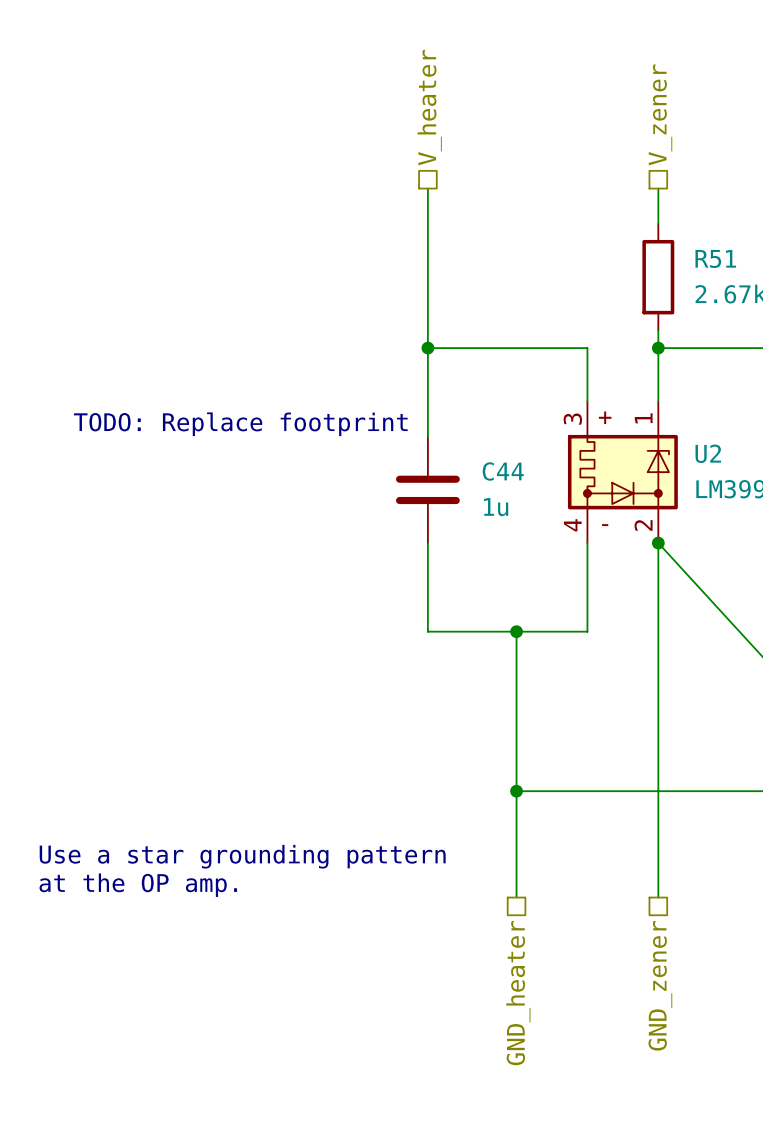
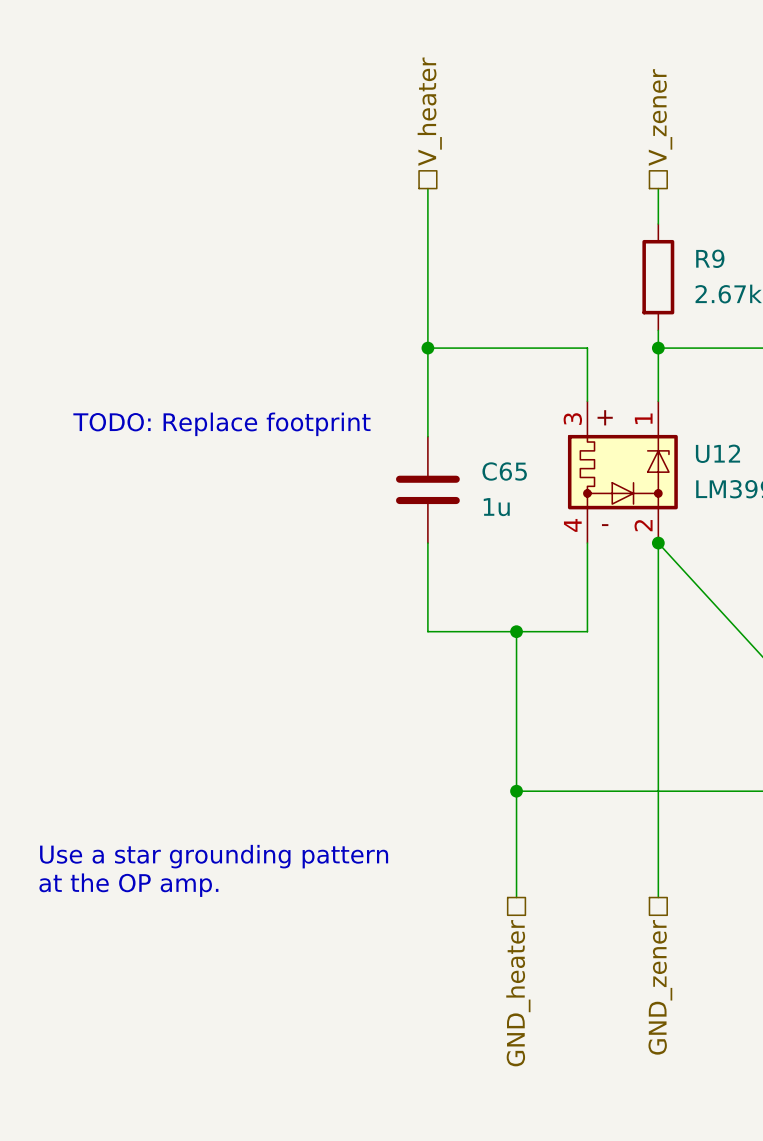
R51 name: R51 (715, 258) -> R9 (710, 258)
U2 name: U2 (708, 453) -> U12 (717, 453)
C44 name: C44 (503, 471) -> C65 (504, 471)

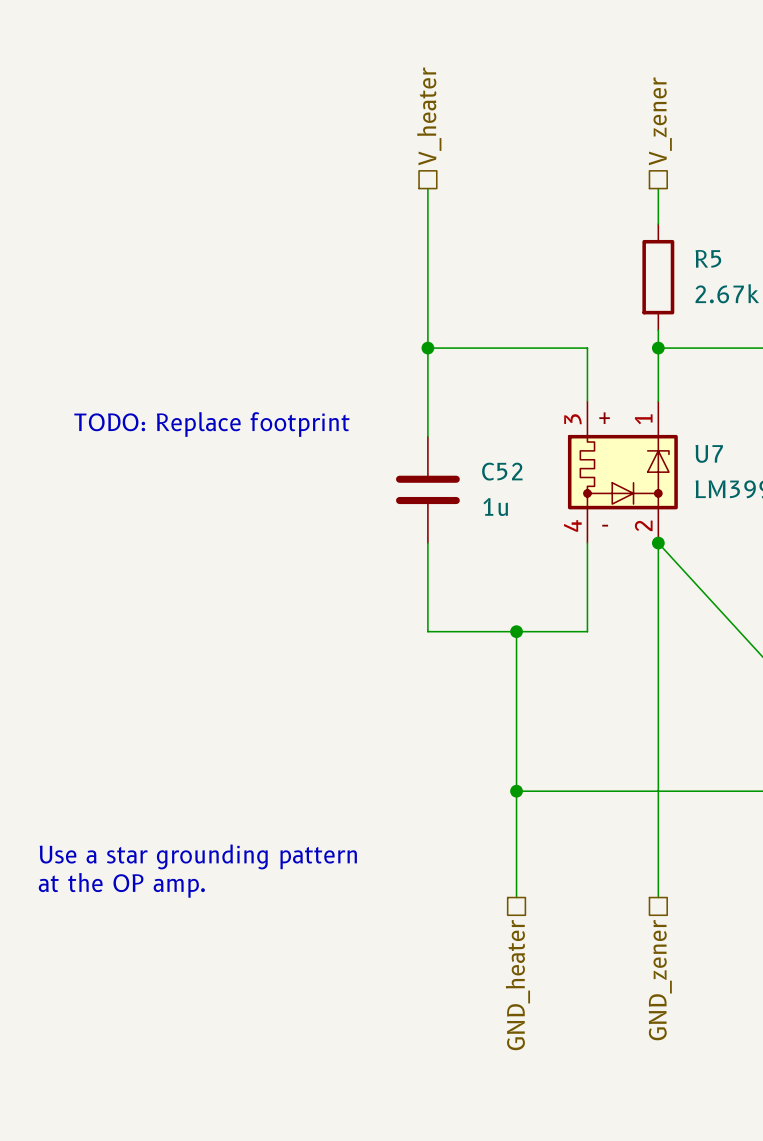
R9 name: R9 (710, 258) -> R5 (708, 258)
U12 name: U12 (717, 453) -> U7 (709, 453)
C65 name: C65 (504, 471) -> C52 (502, 471)

